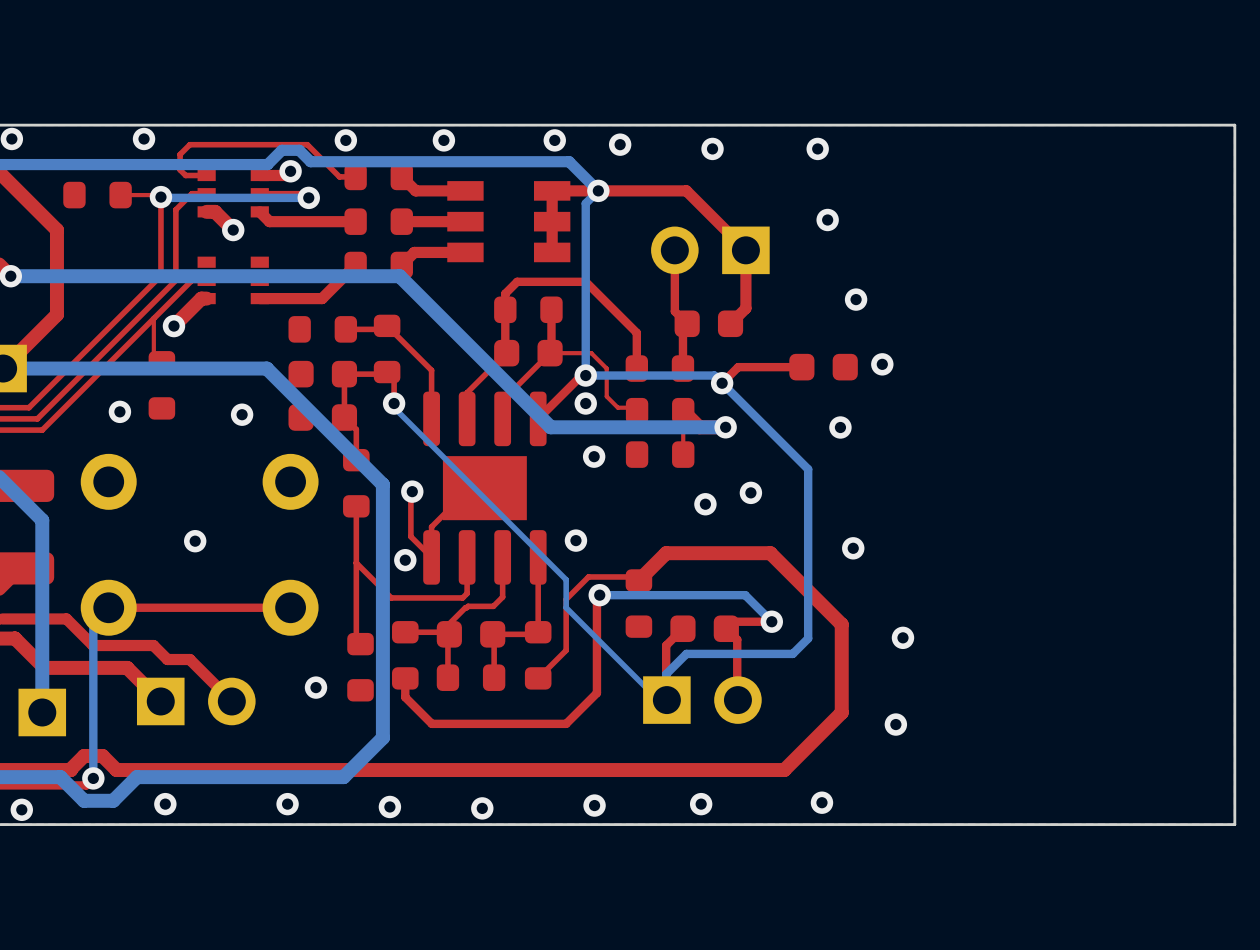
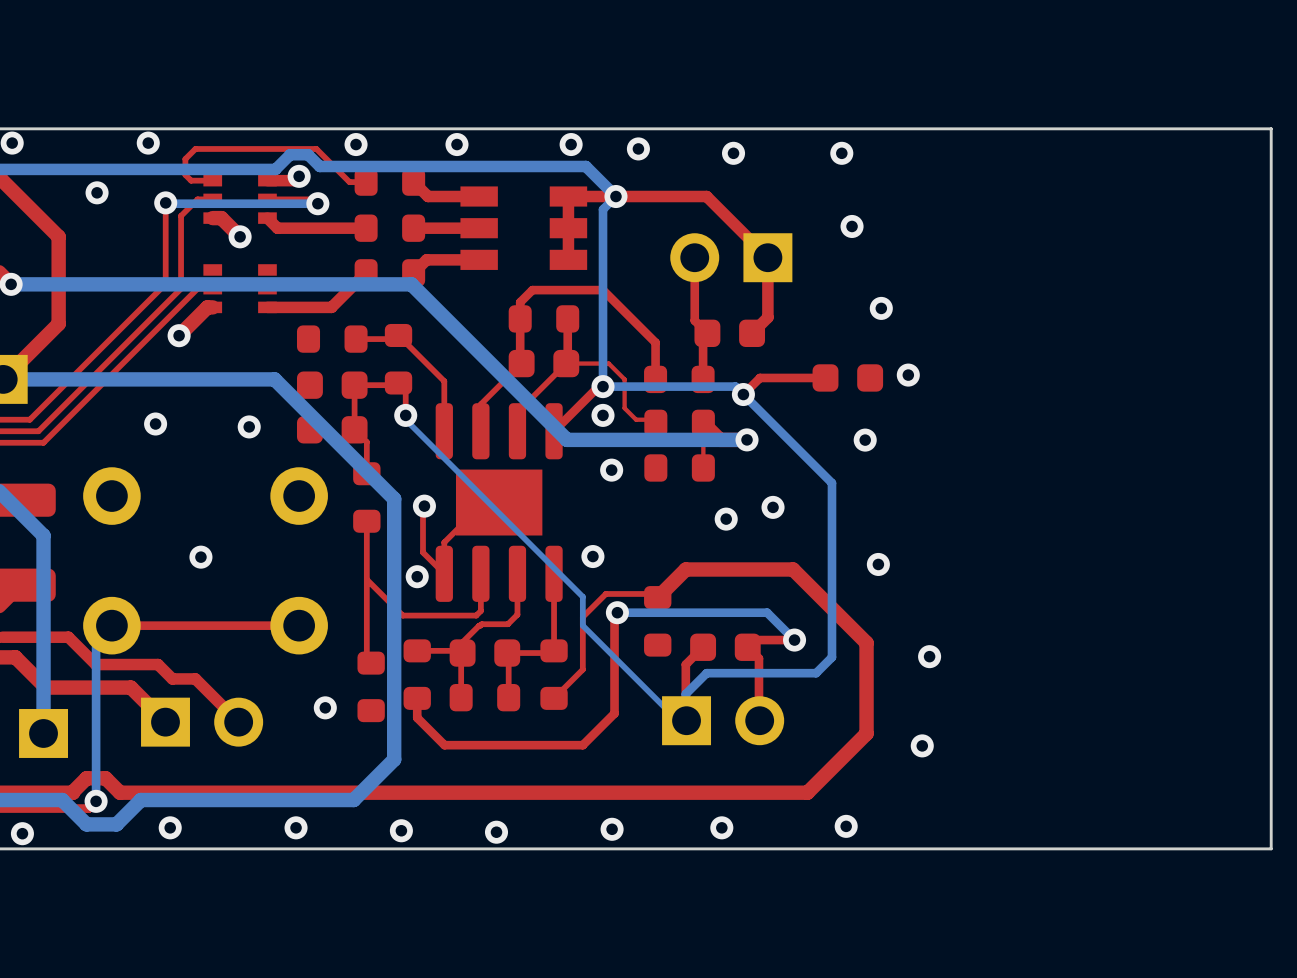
via: none -> (97, 192)
part: (97, 195) -> none
top track: (120, 195) (158, 195) (160, 197) -> none
top track: (153, 318) (153, 354) (161, 362) -> none
part: (161, 385) -> none
via position: (119, 411) -> (155, 424)

